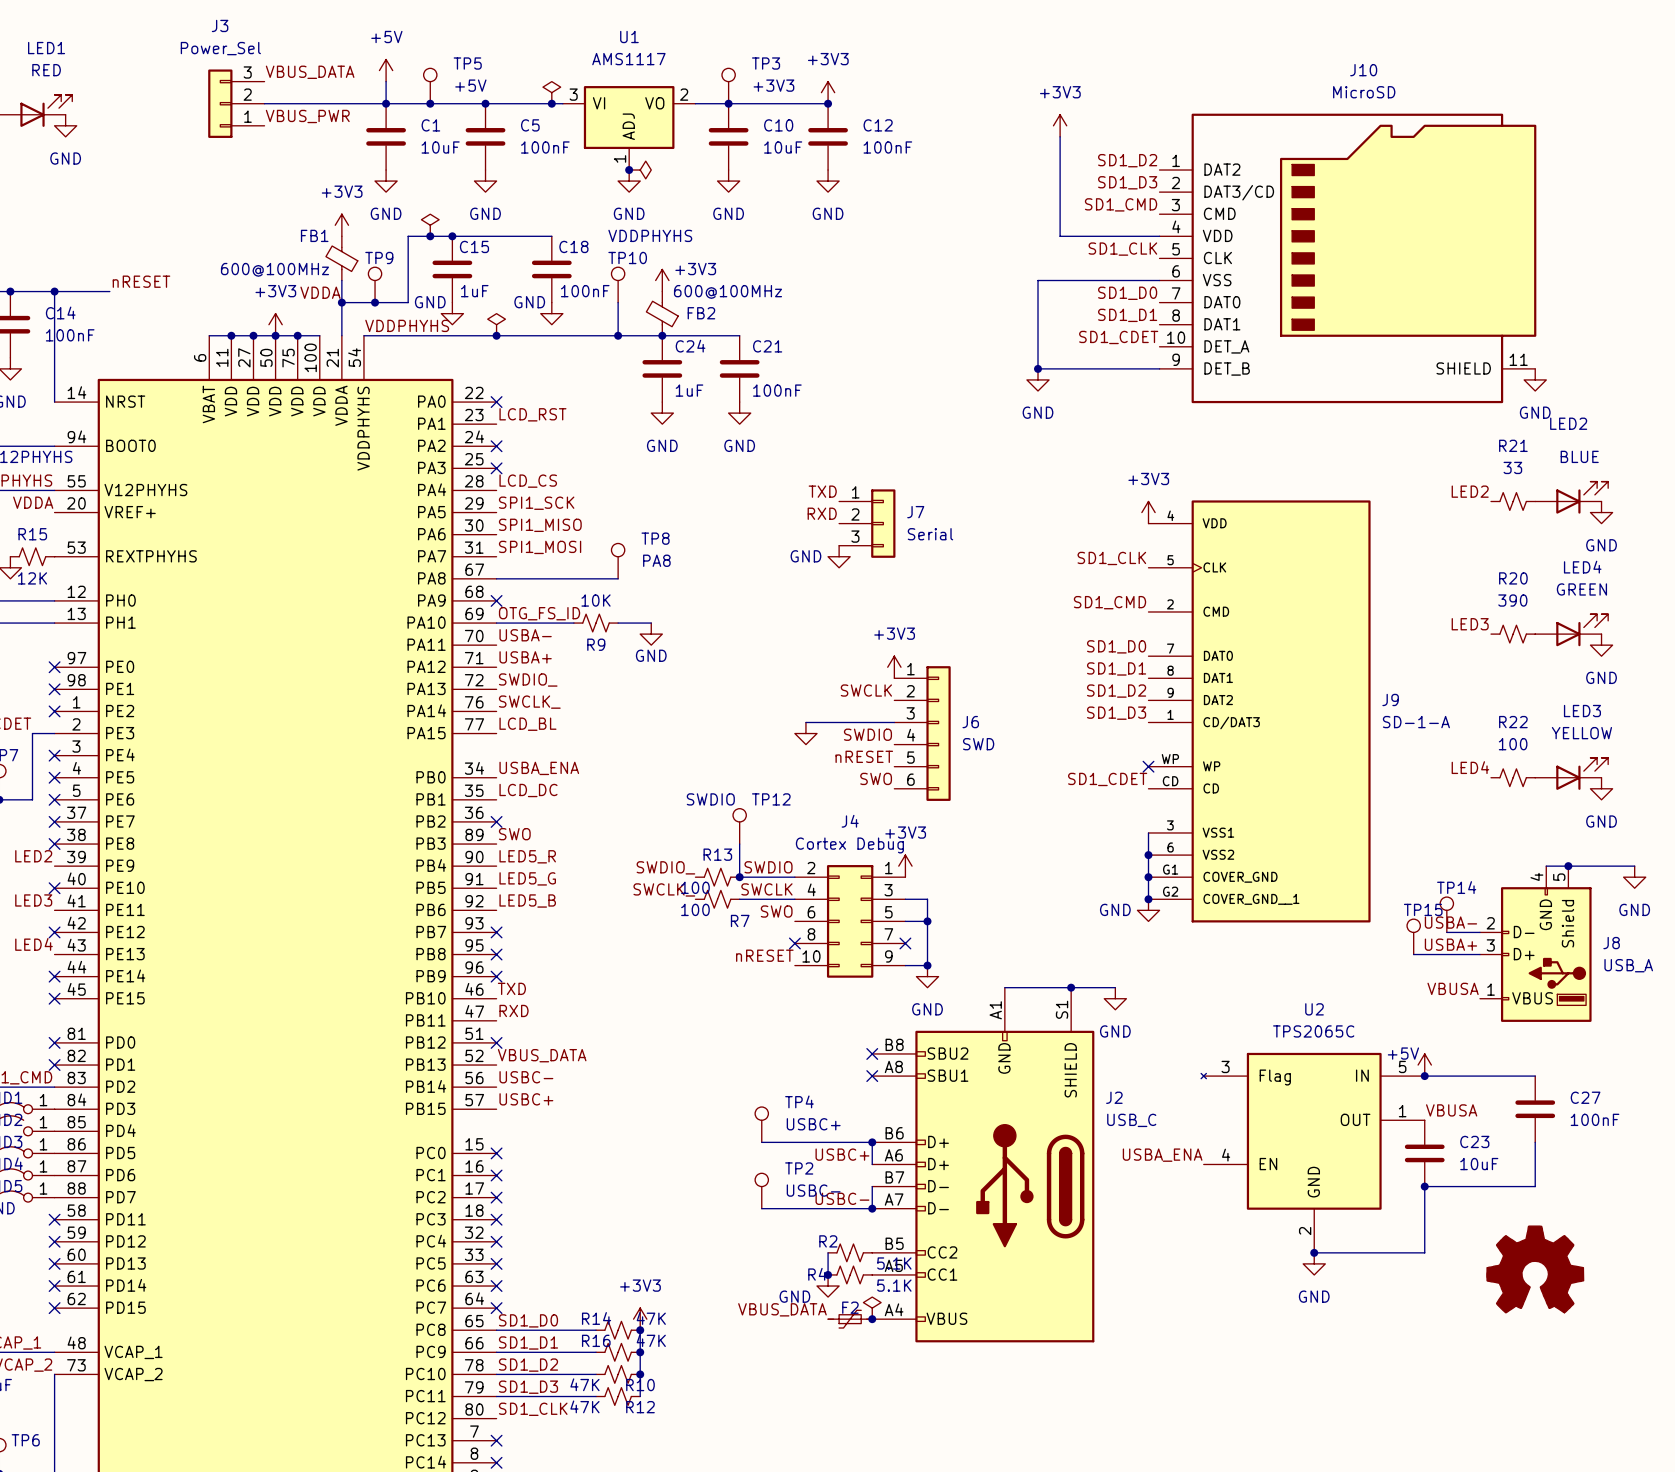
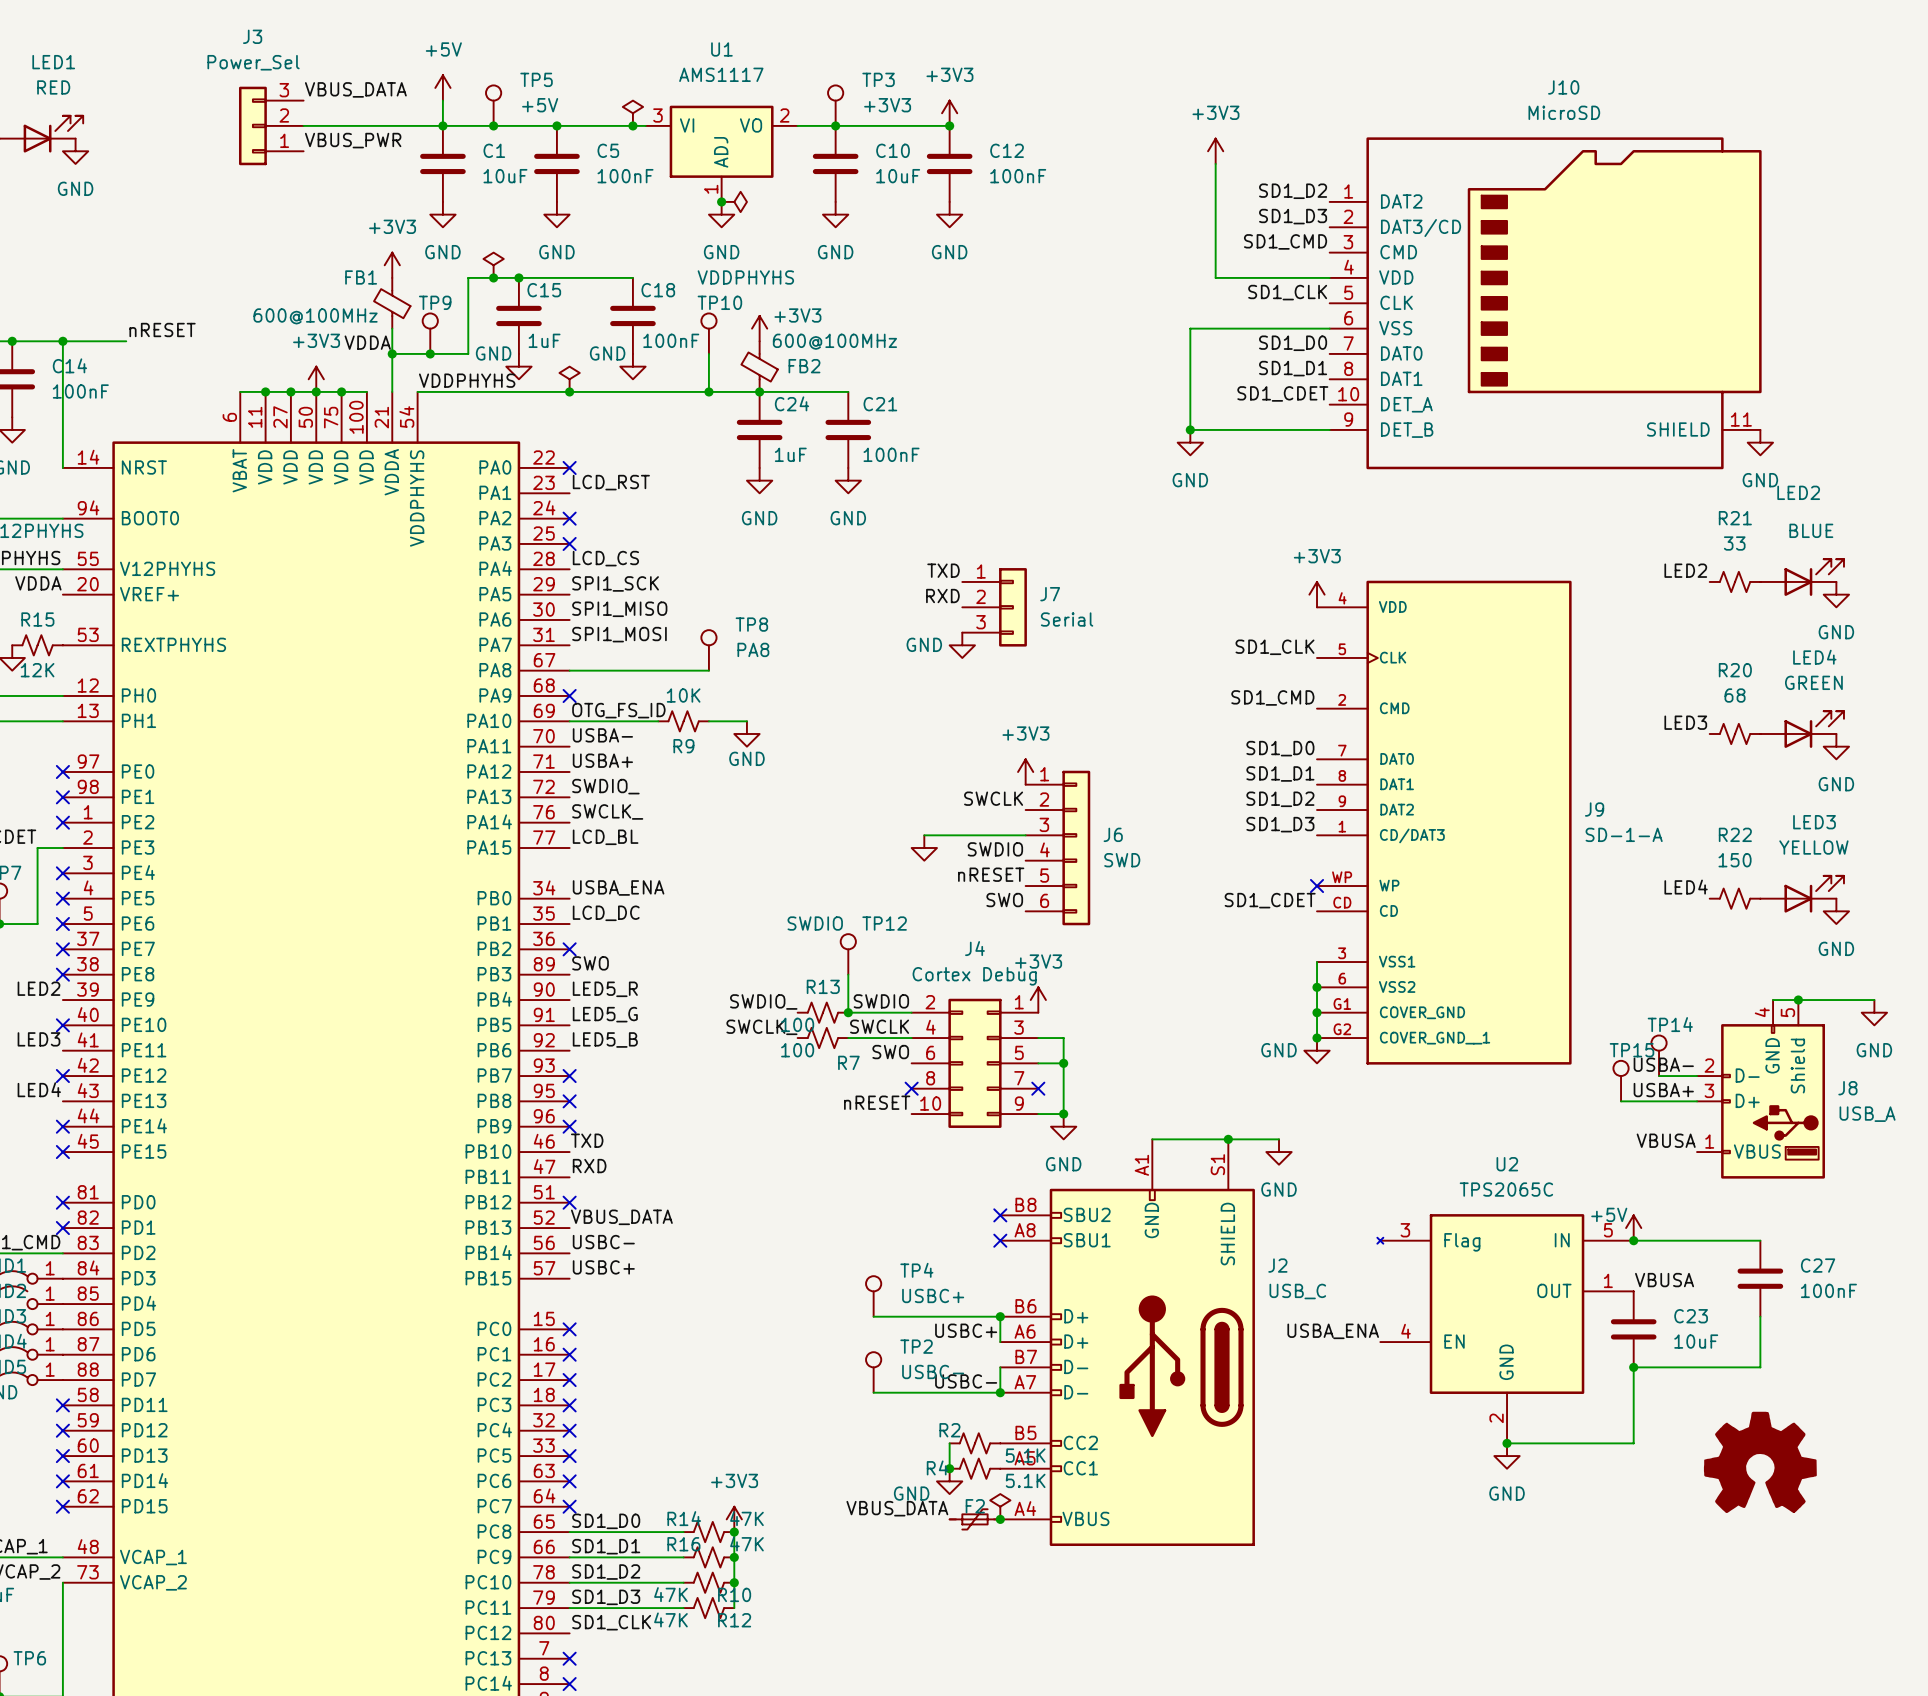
R20 value: 390 (1512, 600) -> 68 (1735, 695)
R22 value: 100 (1513, 744) -> 150 (1735, 860)

